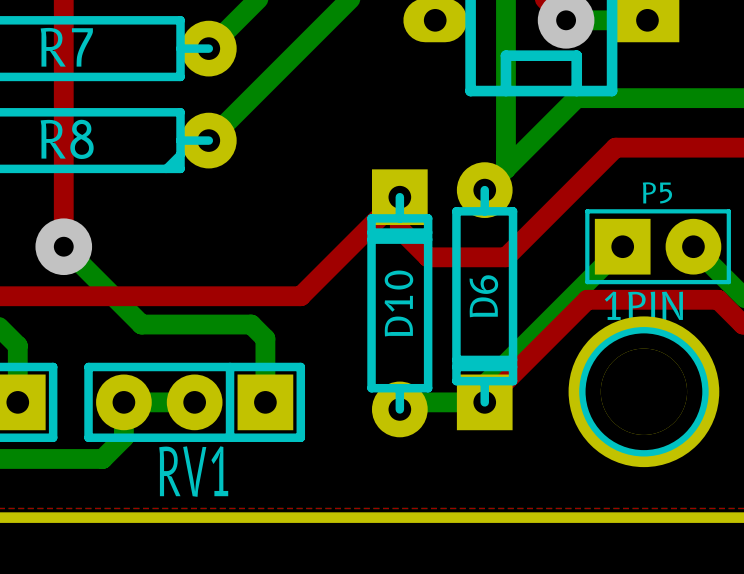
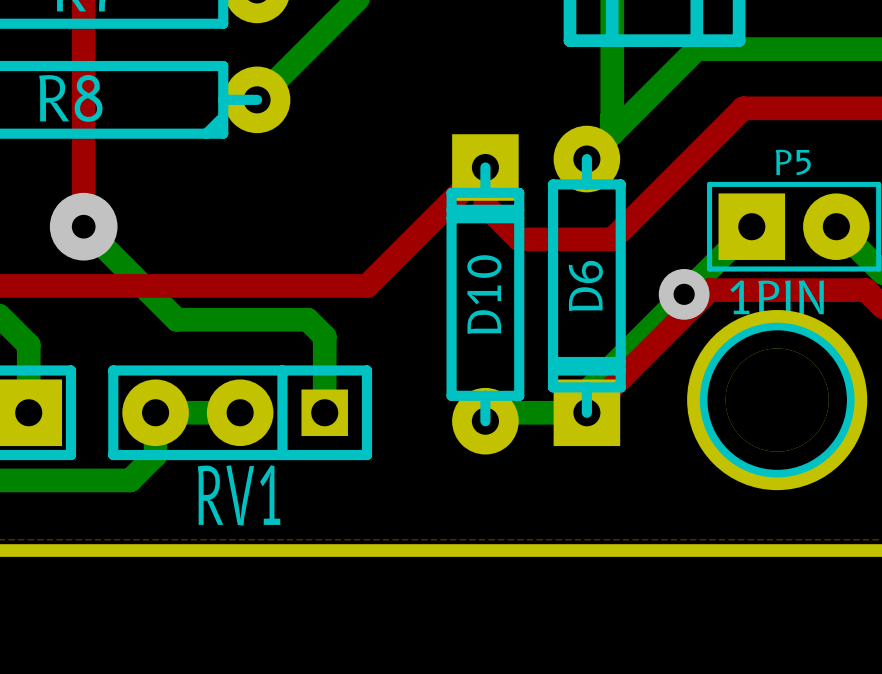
R8 name position: R8 (67, 139) -> R8 (70, 98)
via: none -> (684, 294)
RV1 footprint: [84, 362, 306, 442] -> [108, 365, 373, 461]

